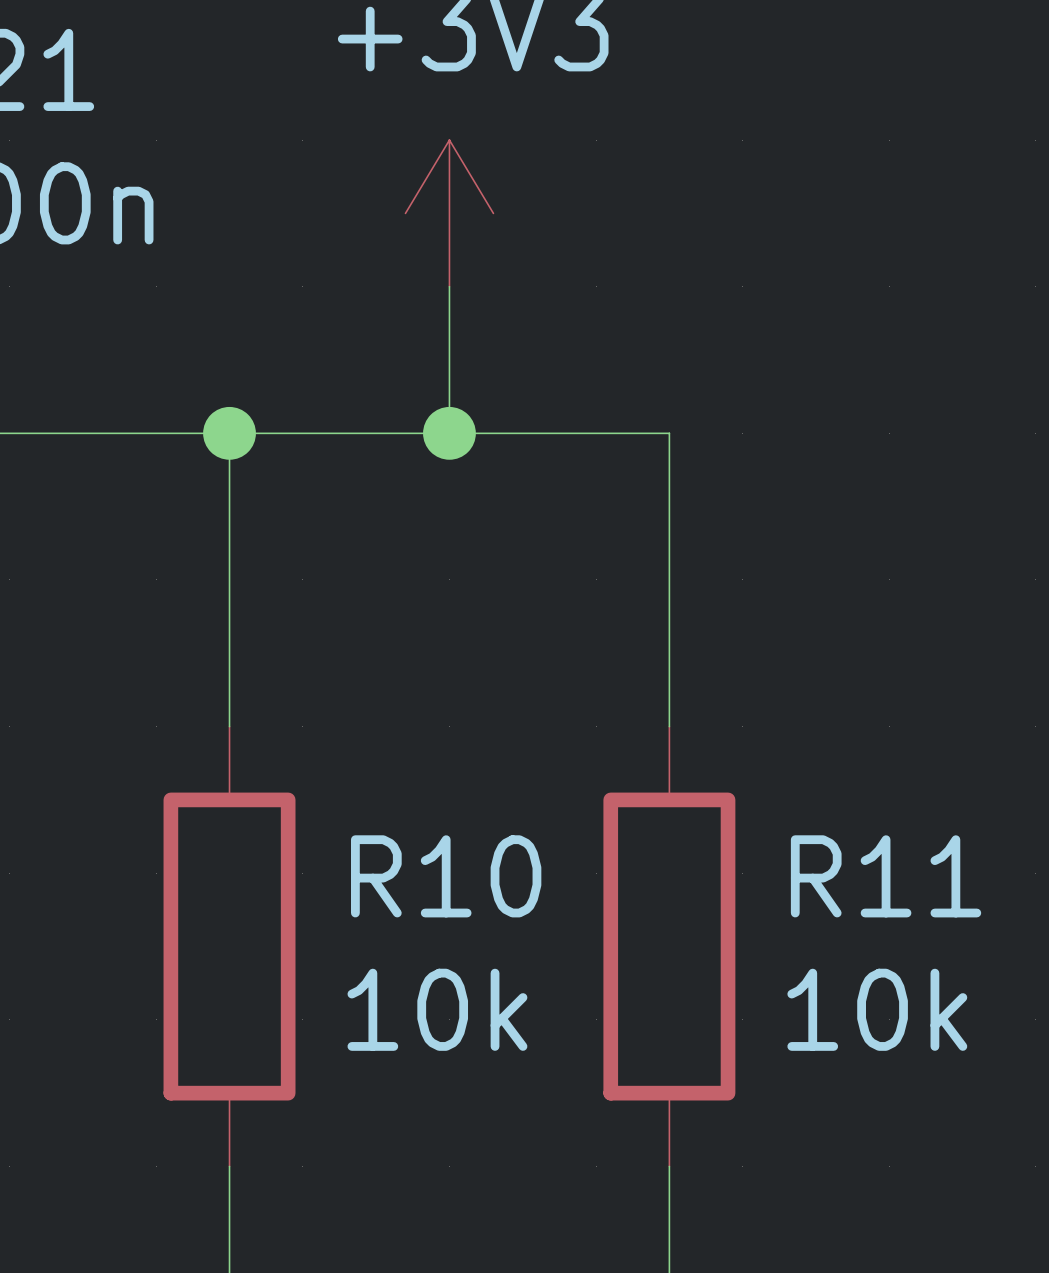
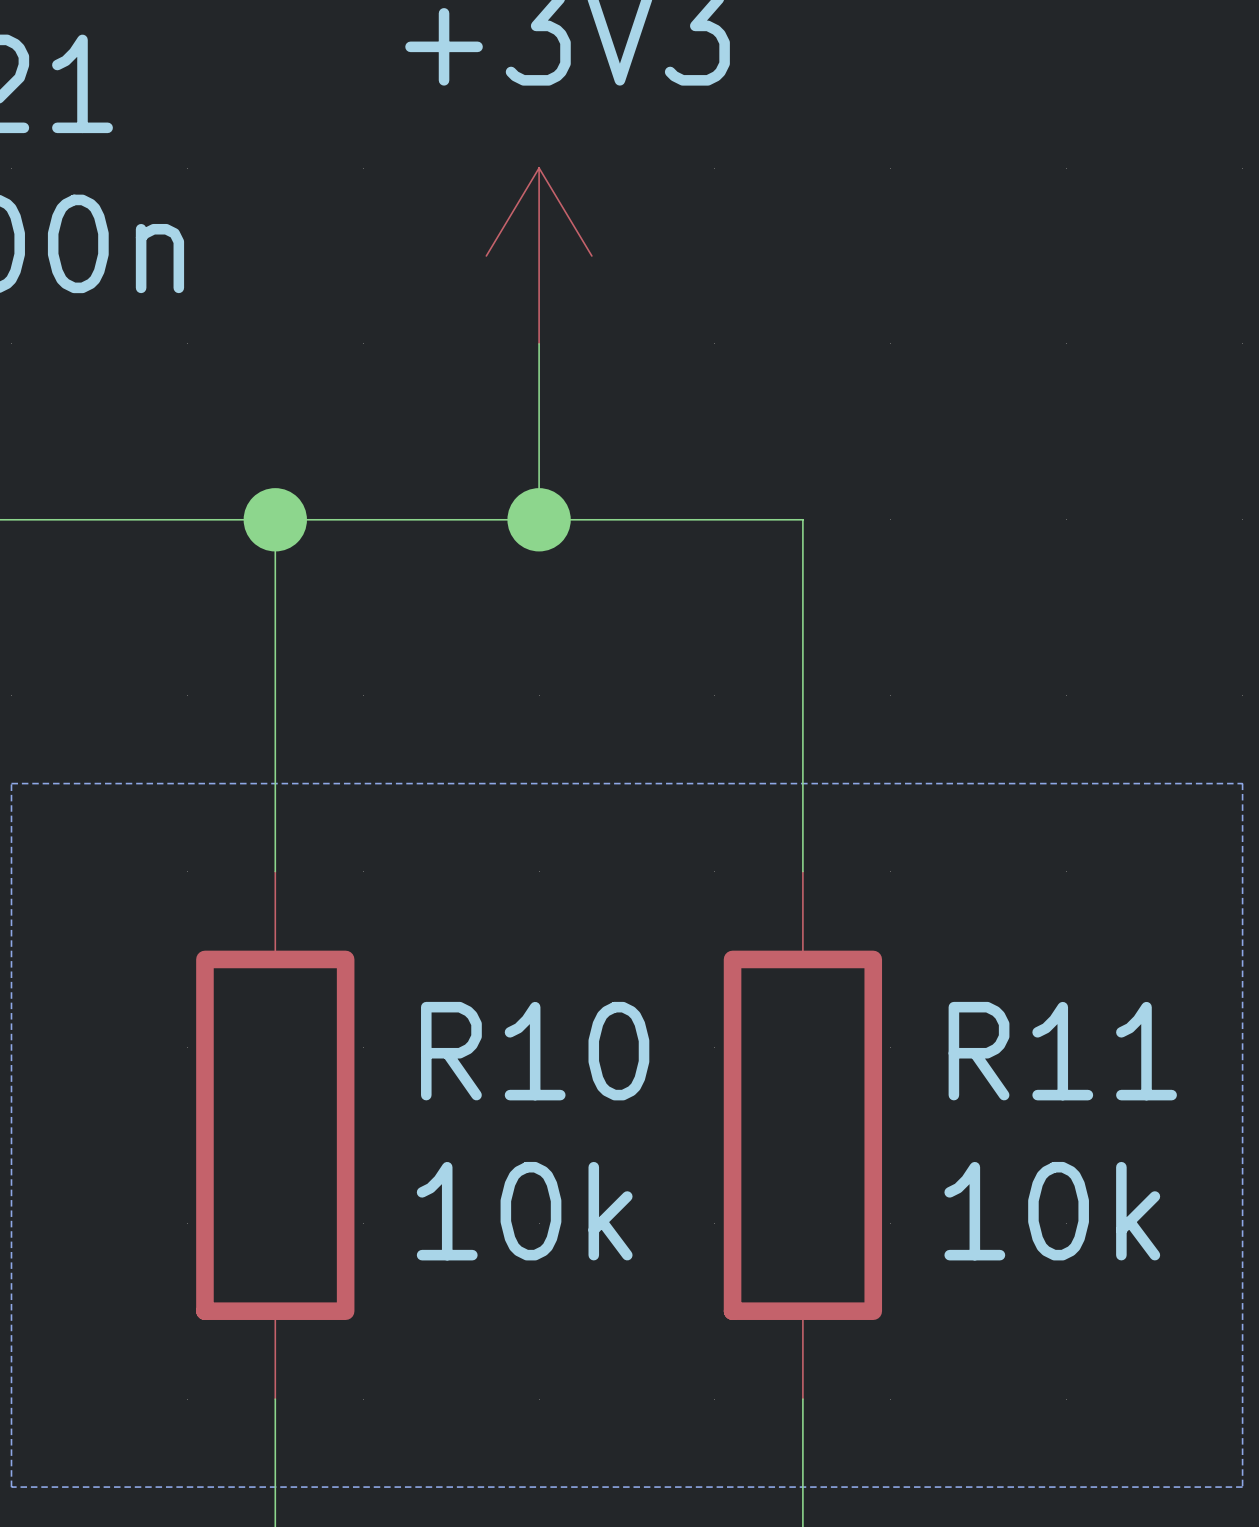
line: none -> (11, 783) (1242, 783) (1242, 1487) (11, 1487) (11, 783)

